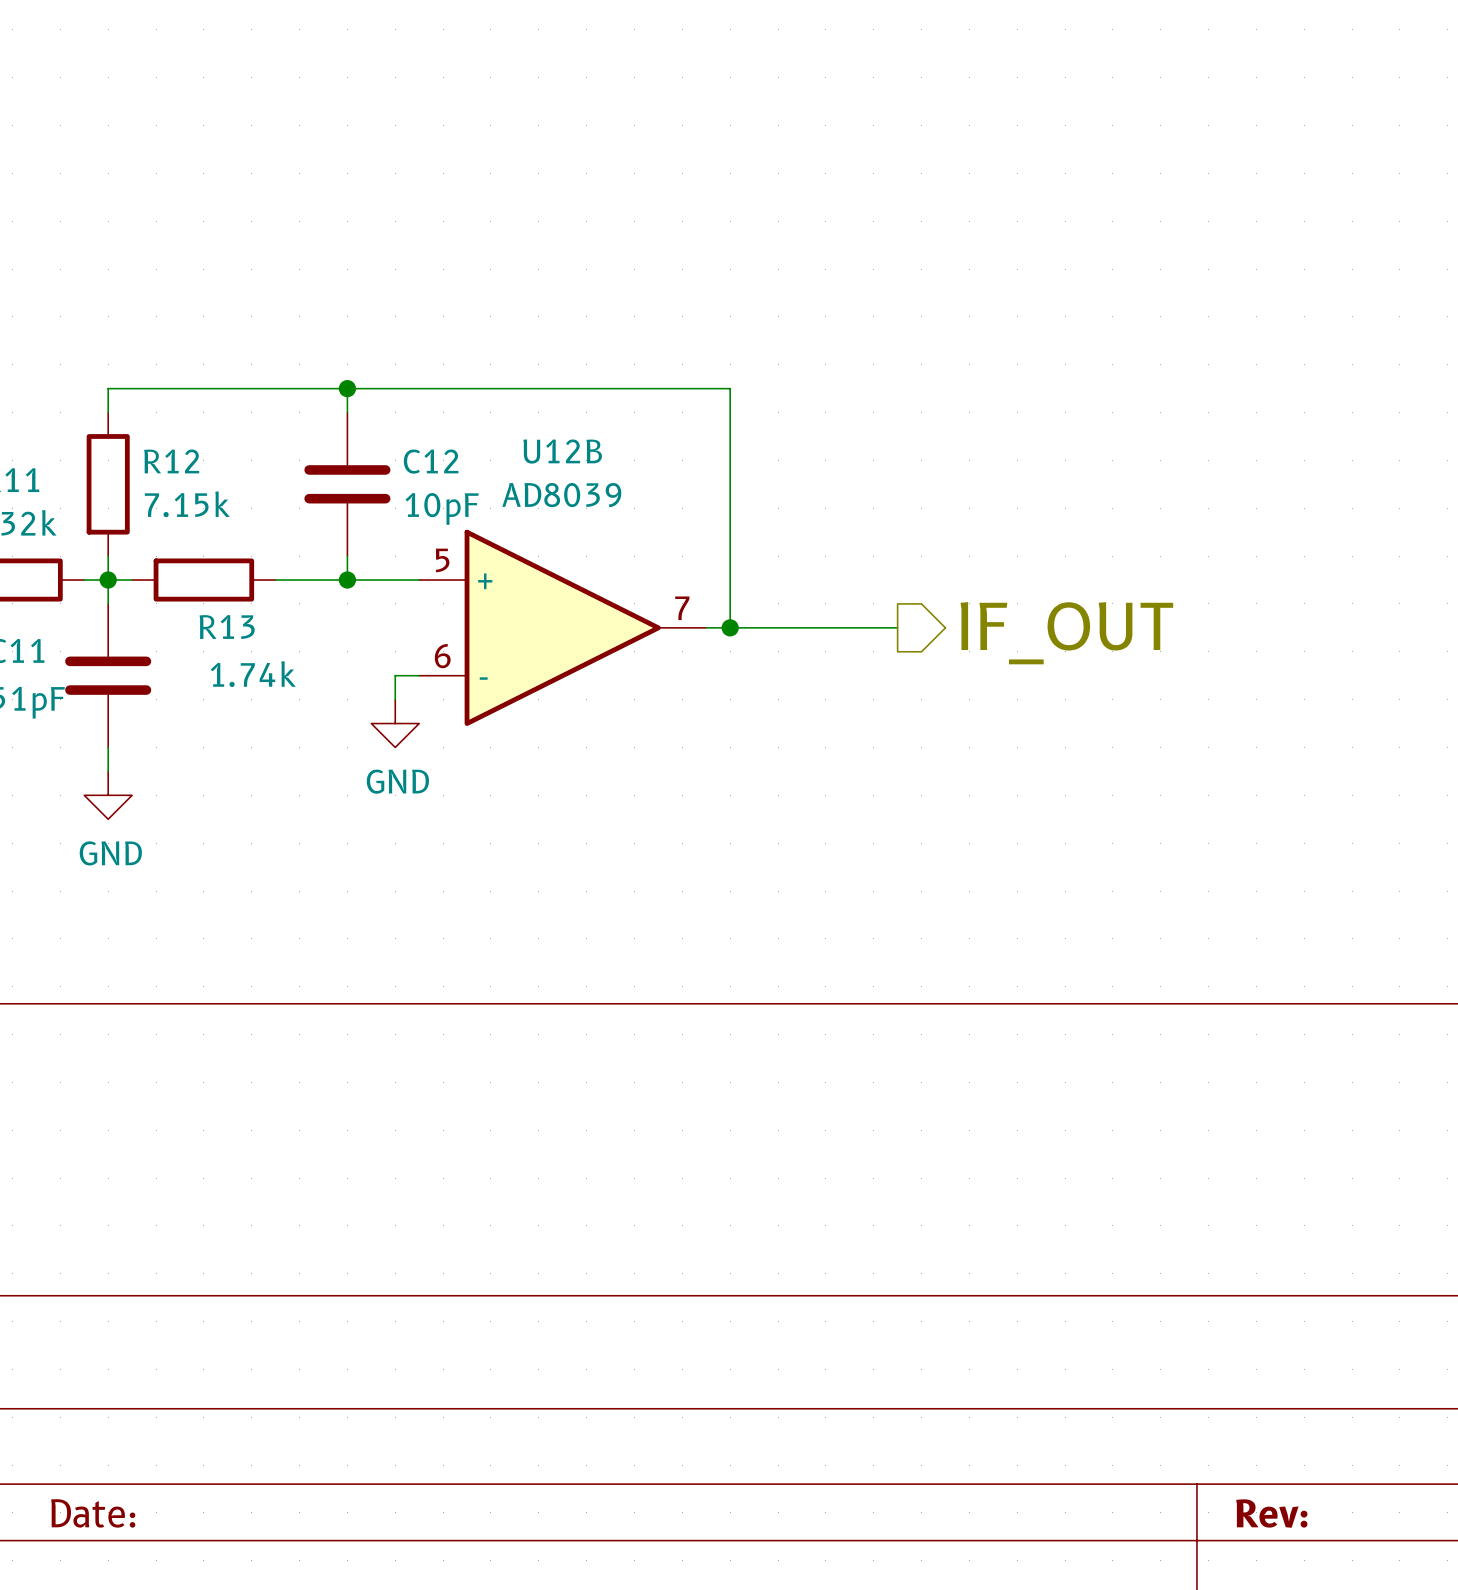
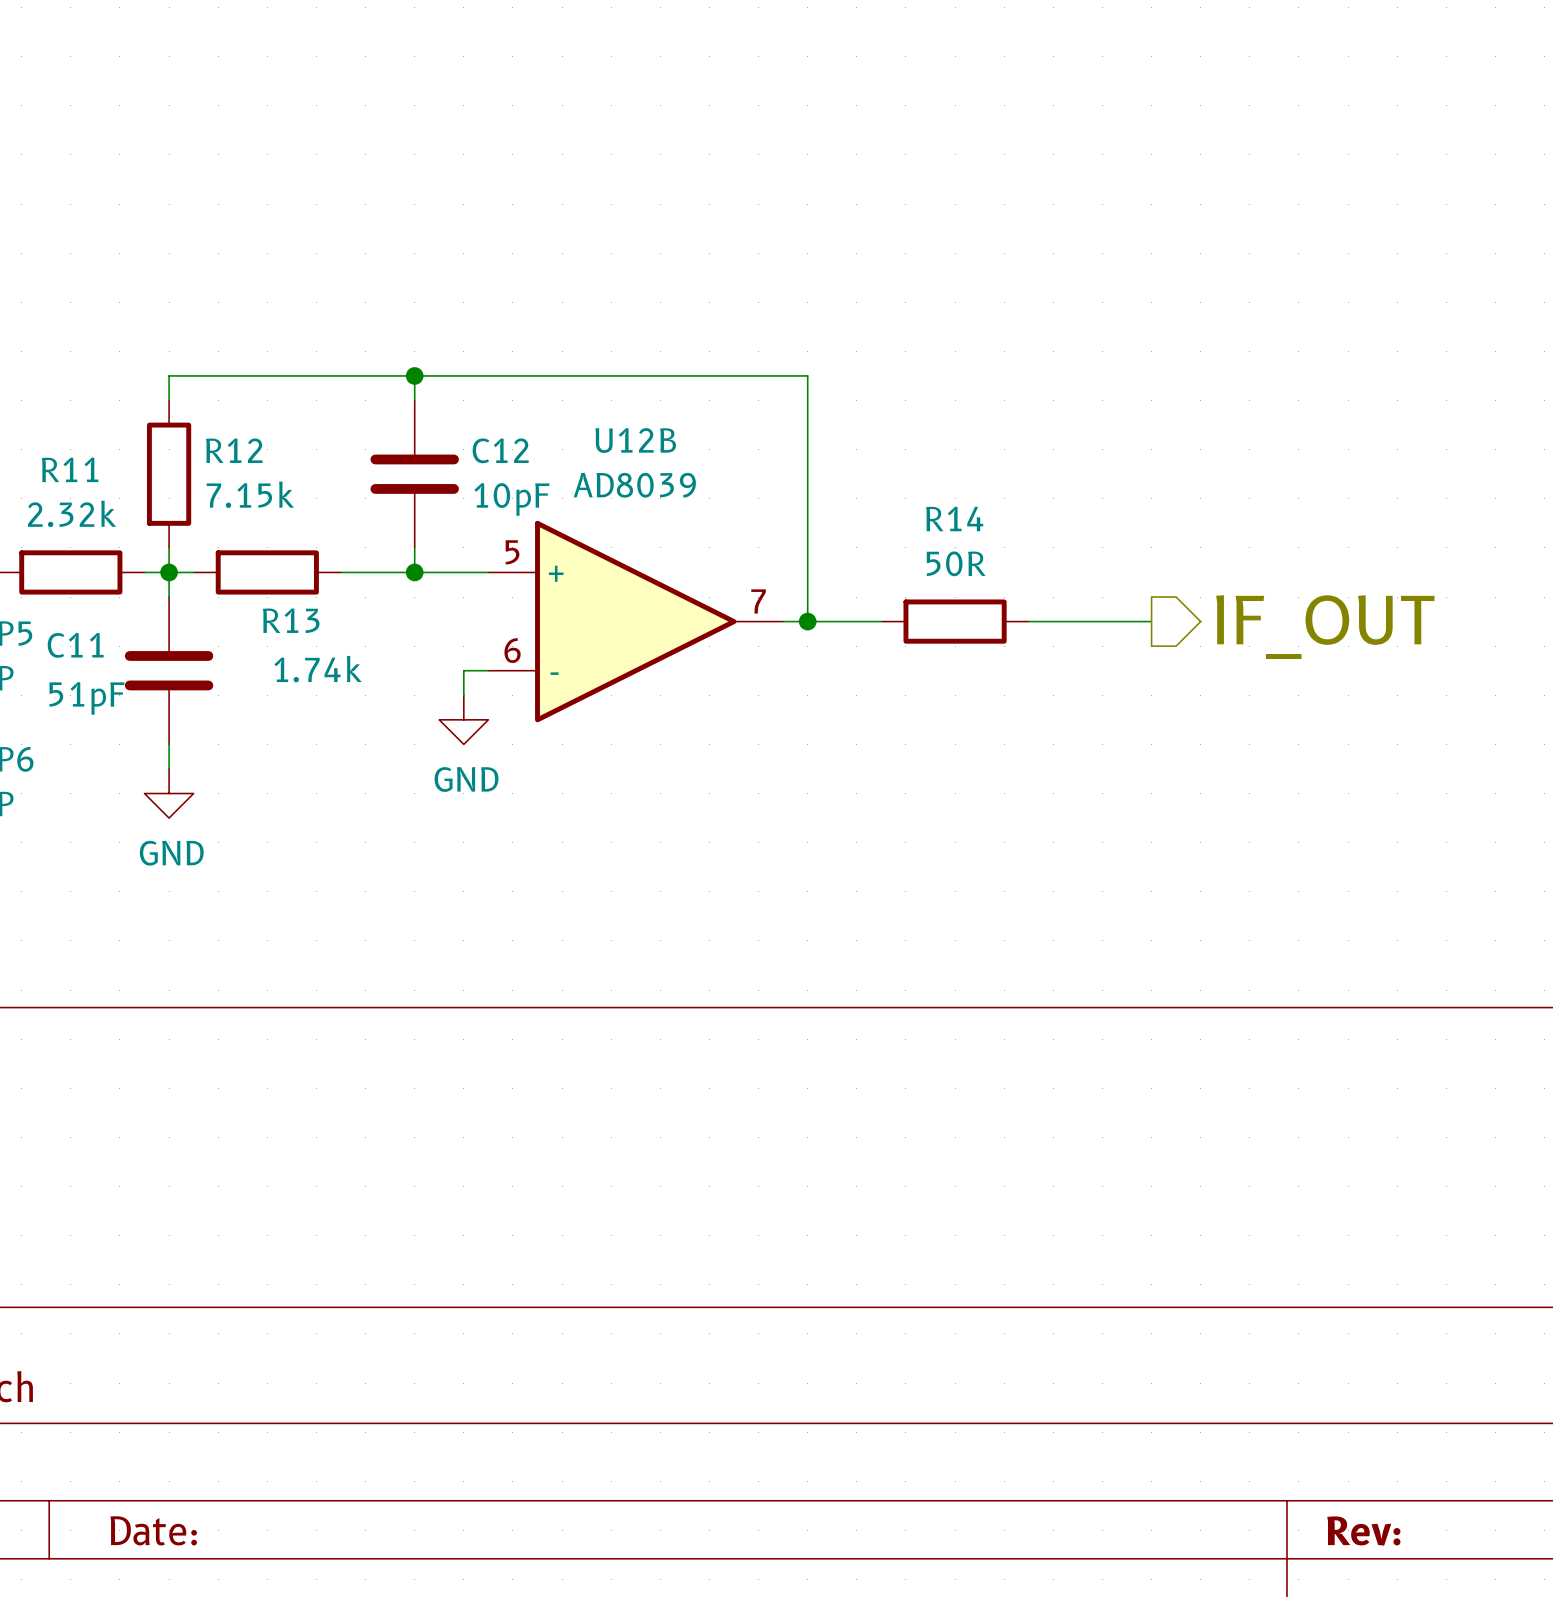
wire: (801, 627) (897, 627) -> none
R14: none -> 50R (955, 621)
wire: none -> (1028, 621) (1151, 621)
hierarchical label position: IF_OUT (1066, 633) -> IF_OUT (1325, 627)

